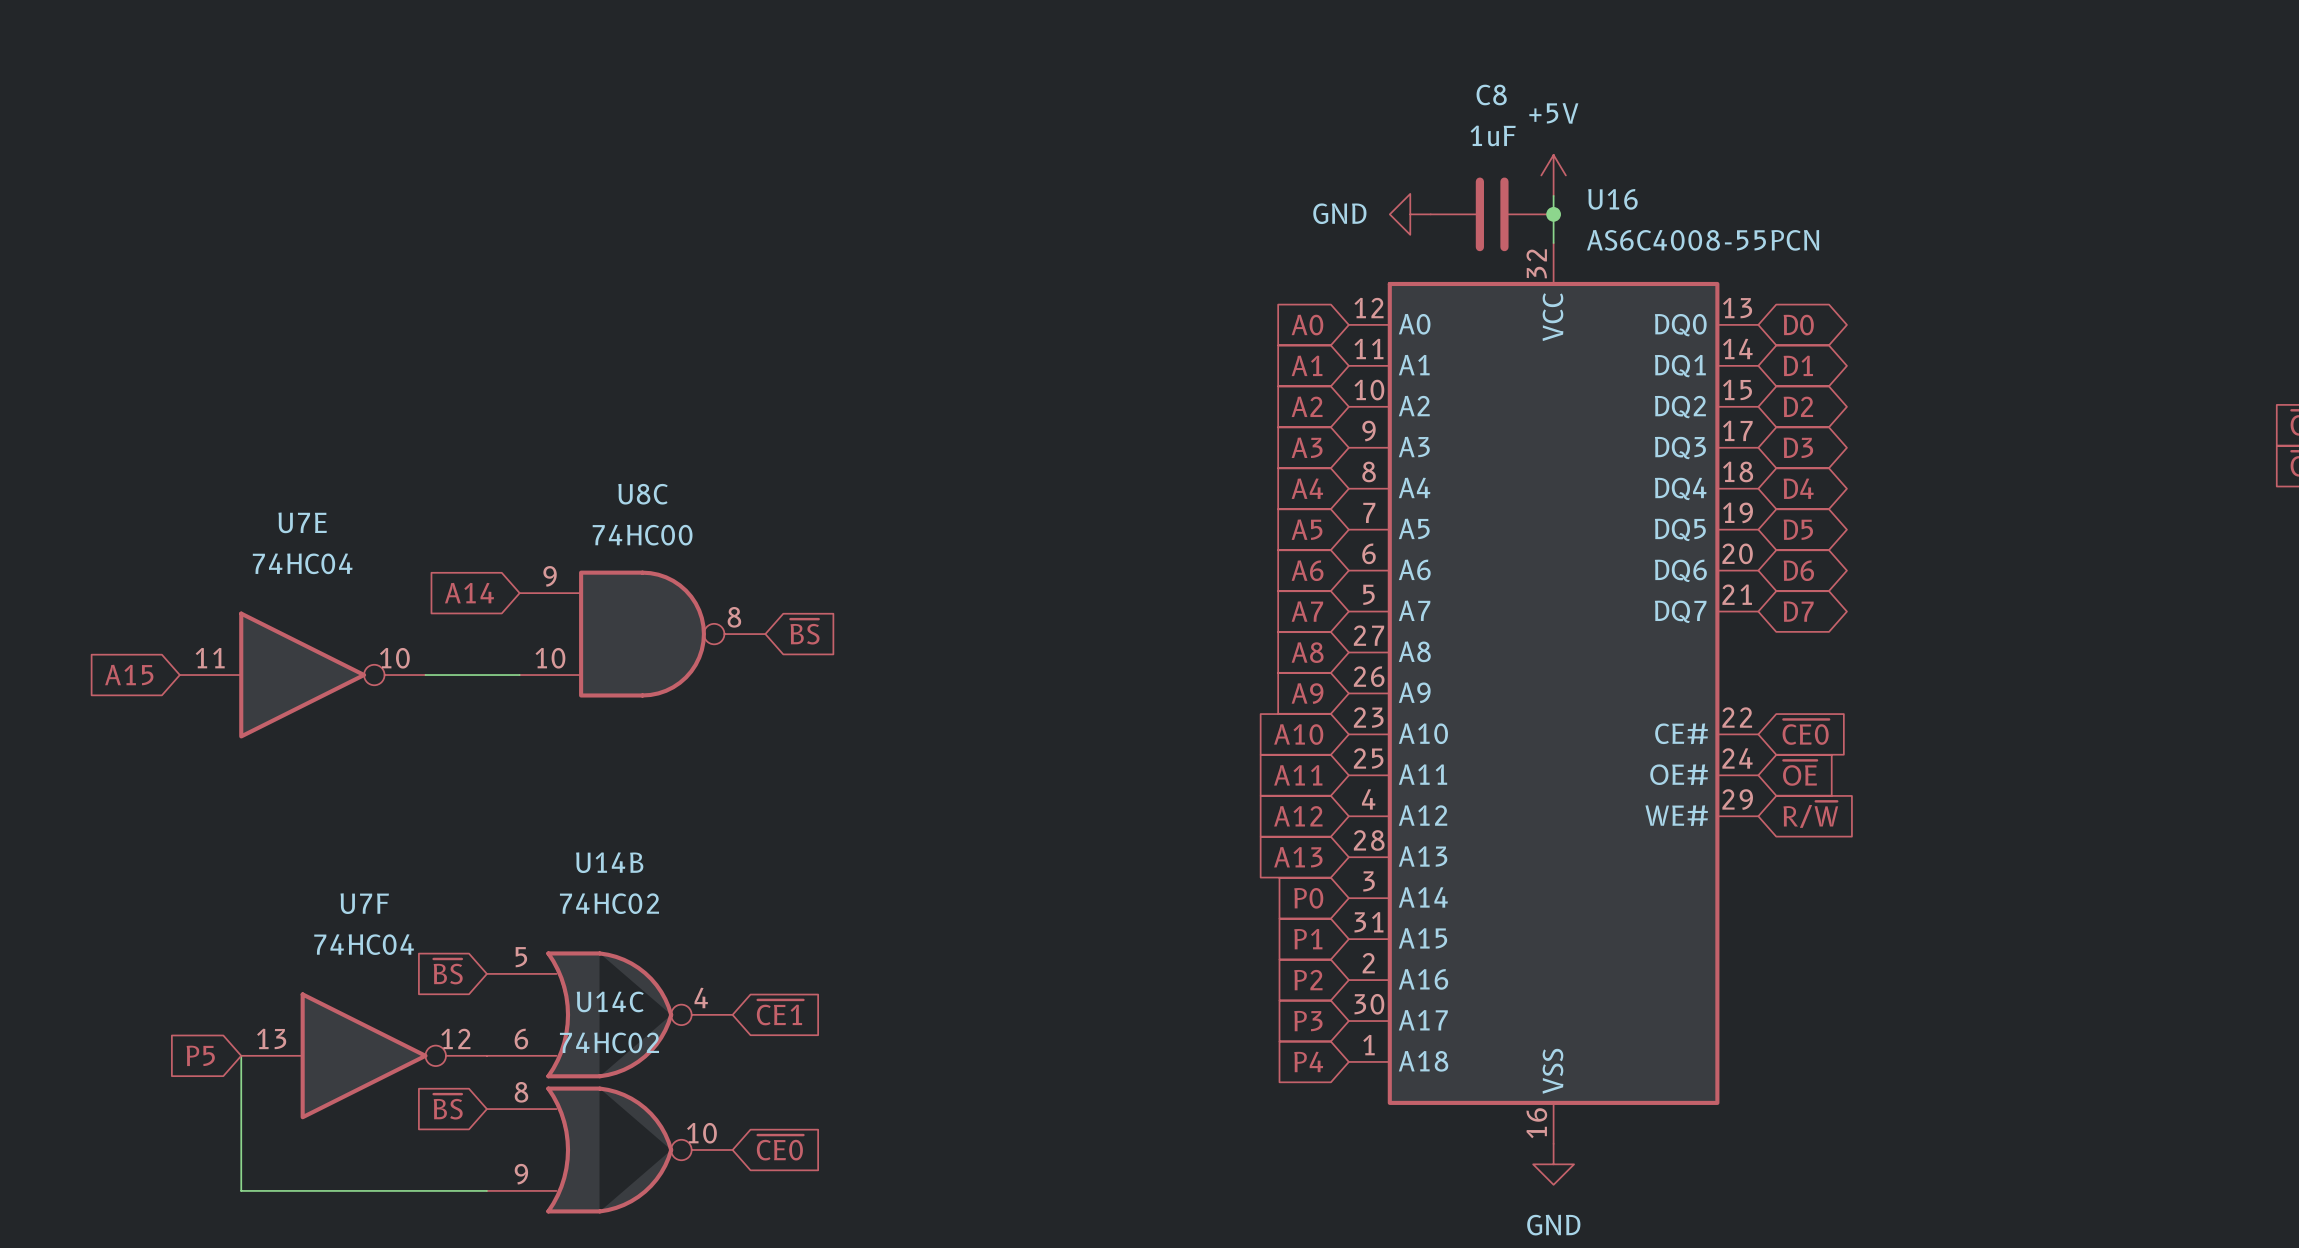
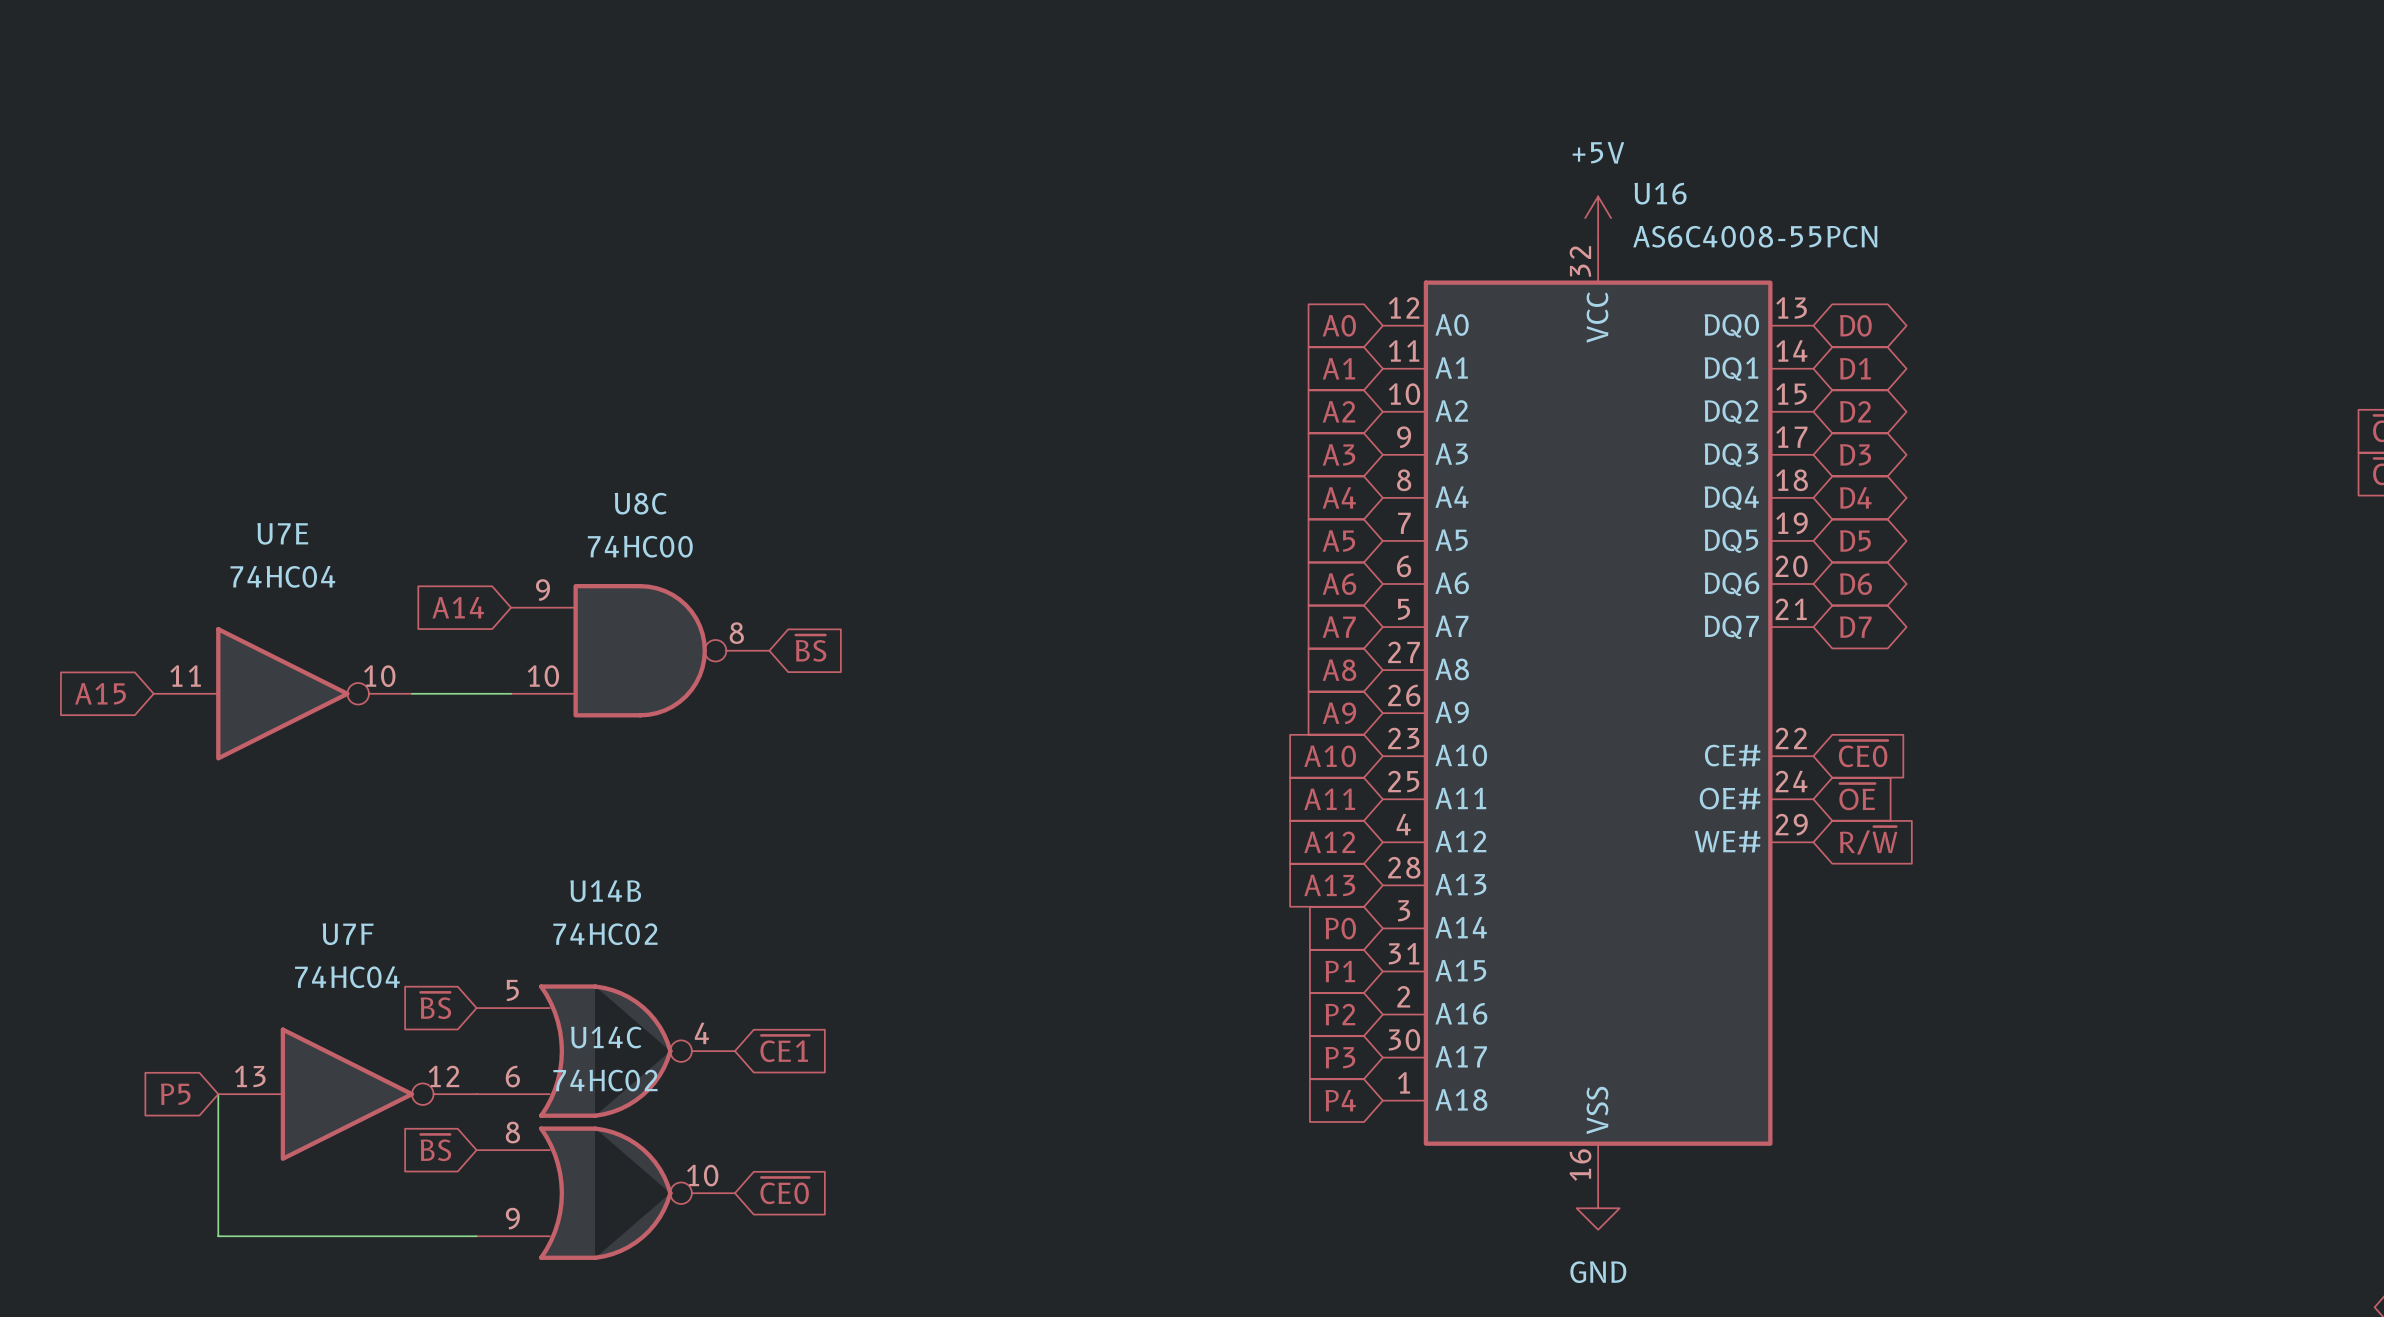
power symbol position: +5V (1553, 175) -> +5V (1598, 218)
power symbol: GND (1410, 214) -> none
C8: 1uF (1492, 214) -> none
junction: (1553, 214) -> none

